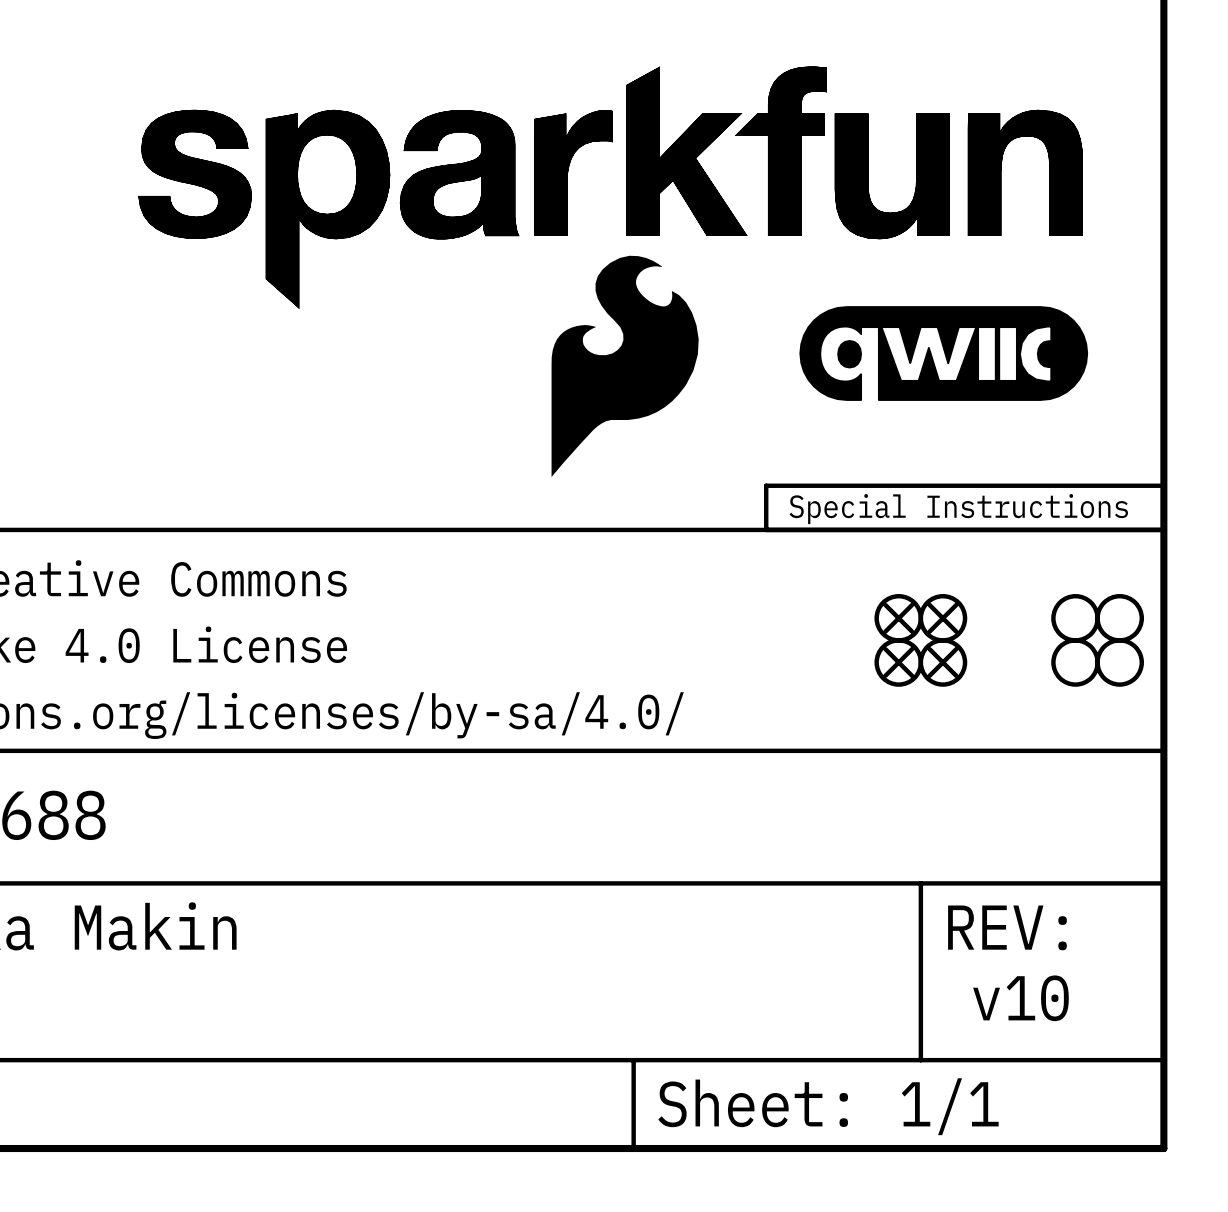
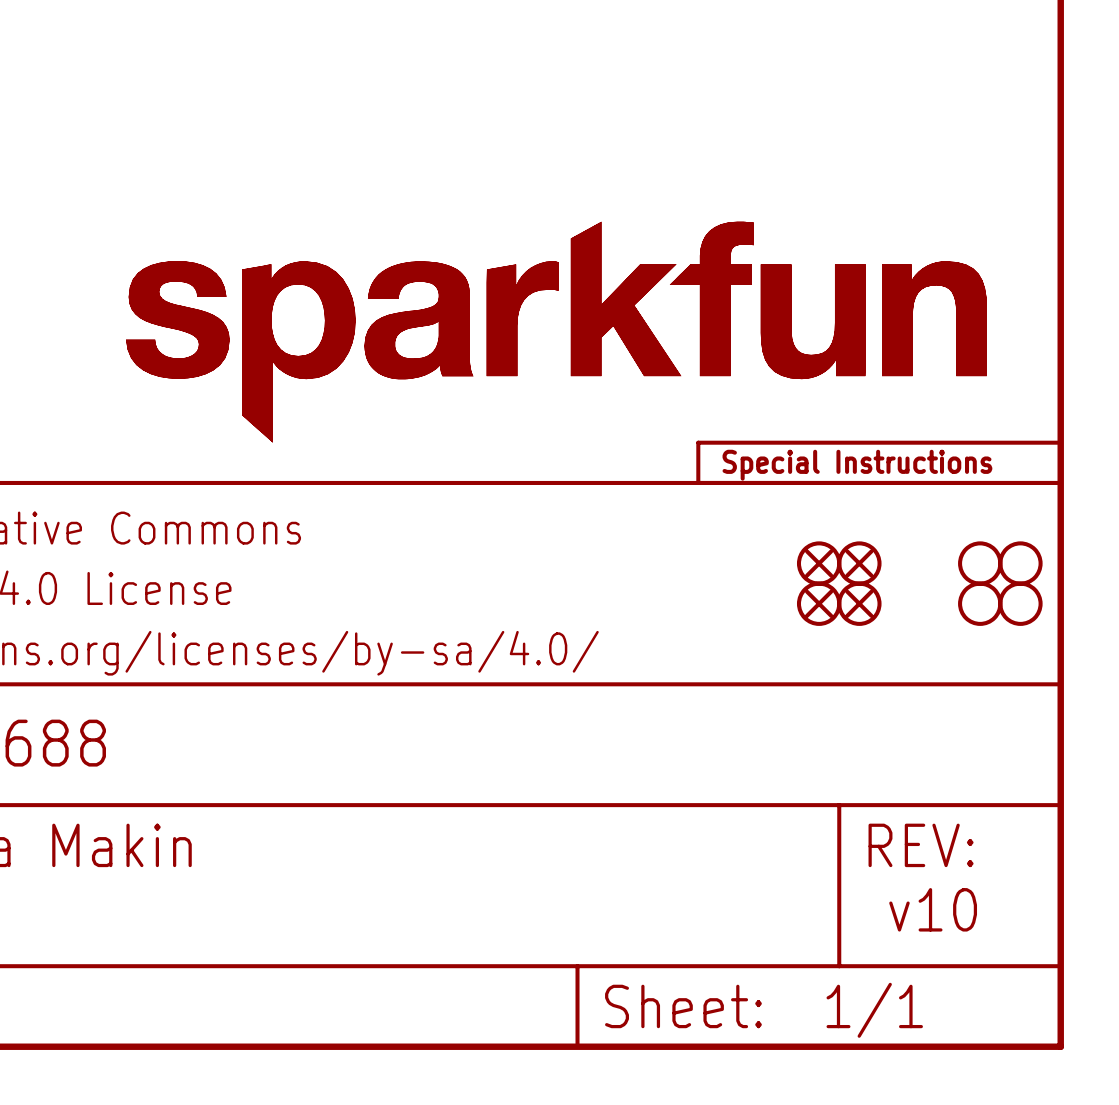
part: (610, 187) -> none
part symbol: [551, 255, 699, 477] -> [125, 221, 987, 443]
part: (943, 353) -> none

